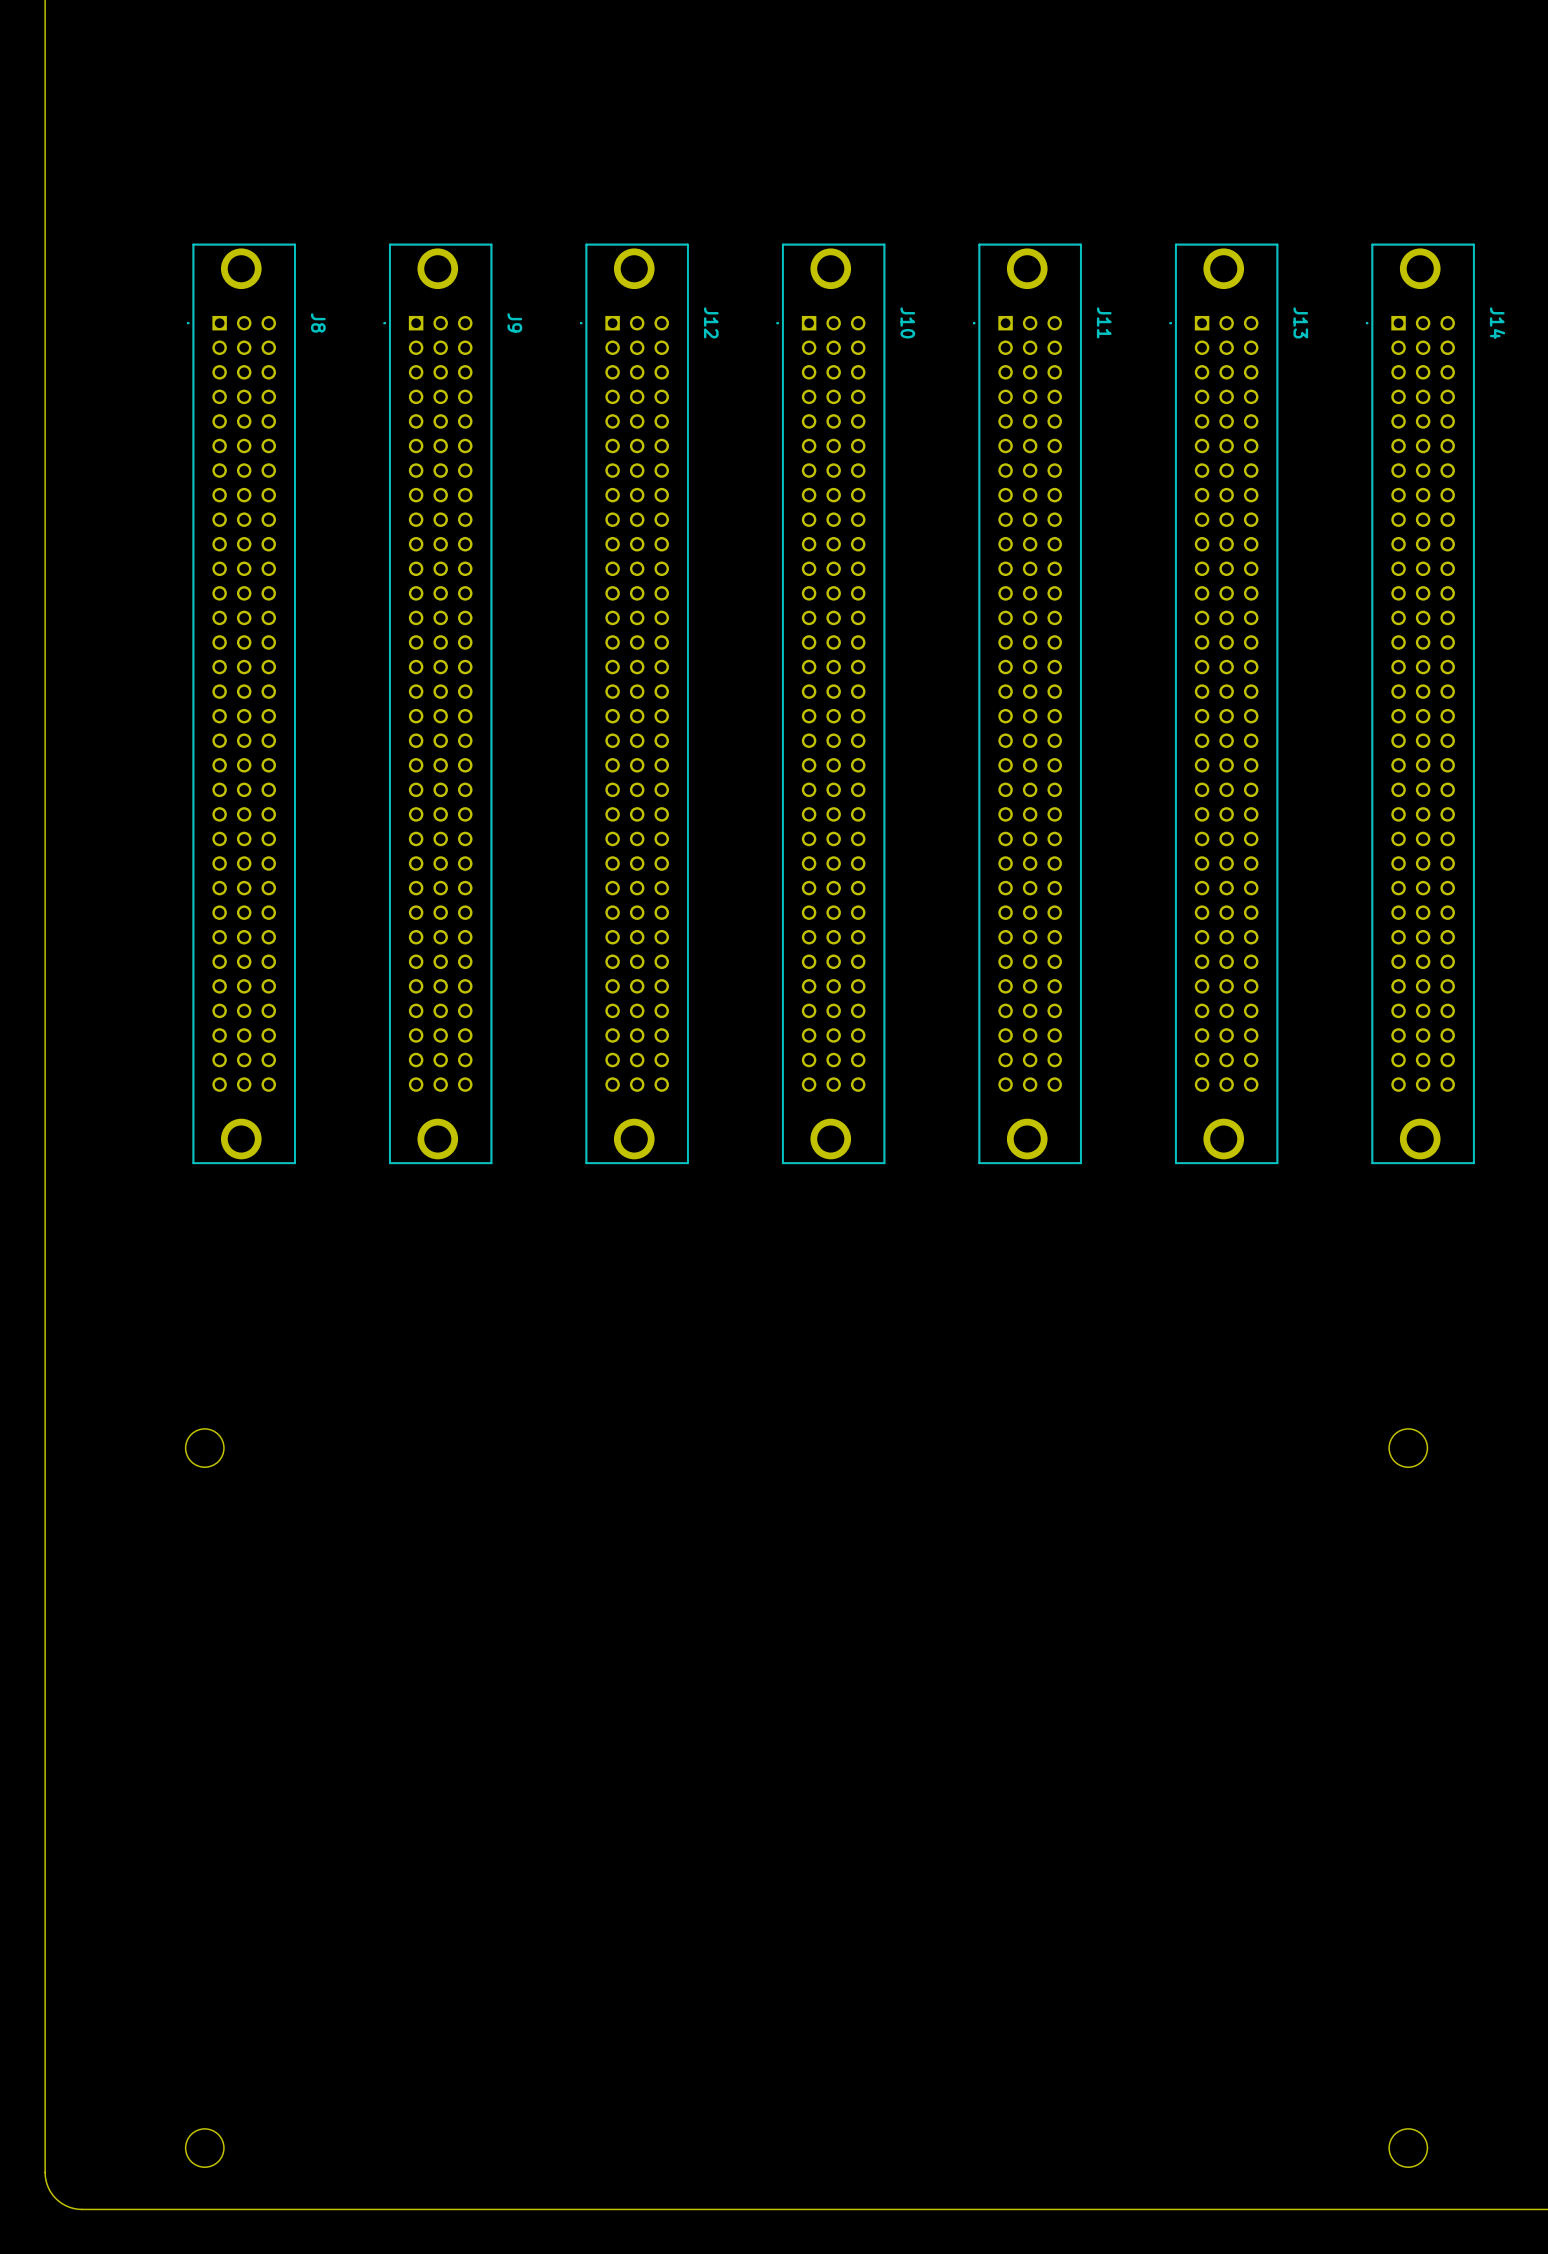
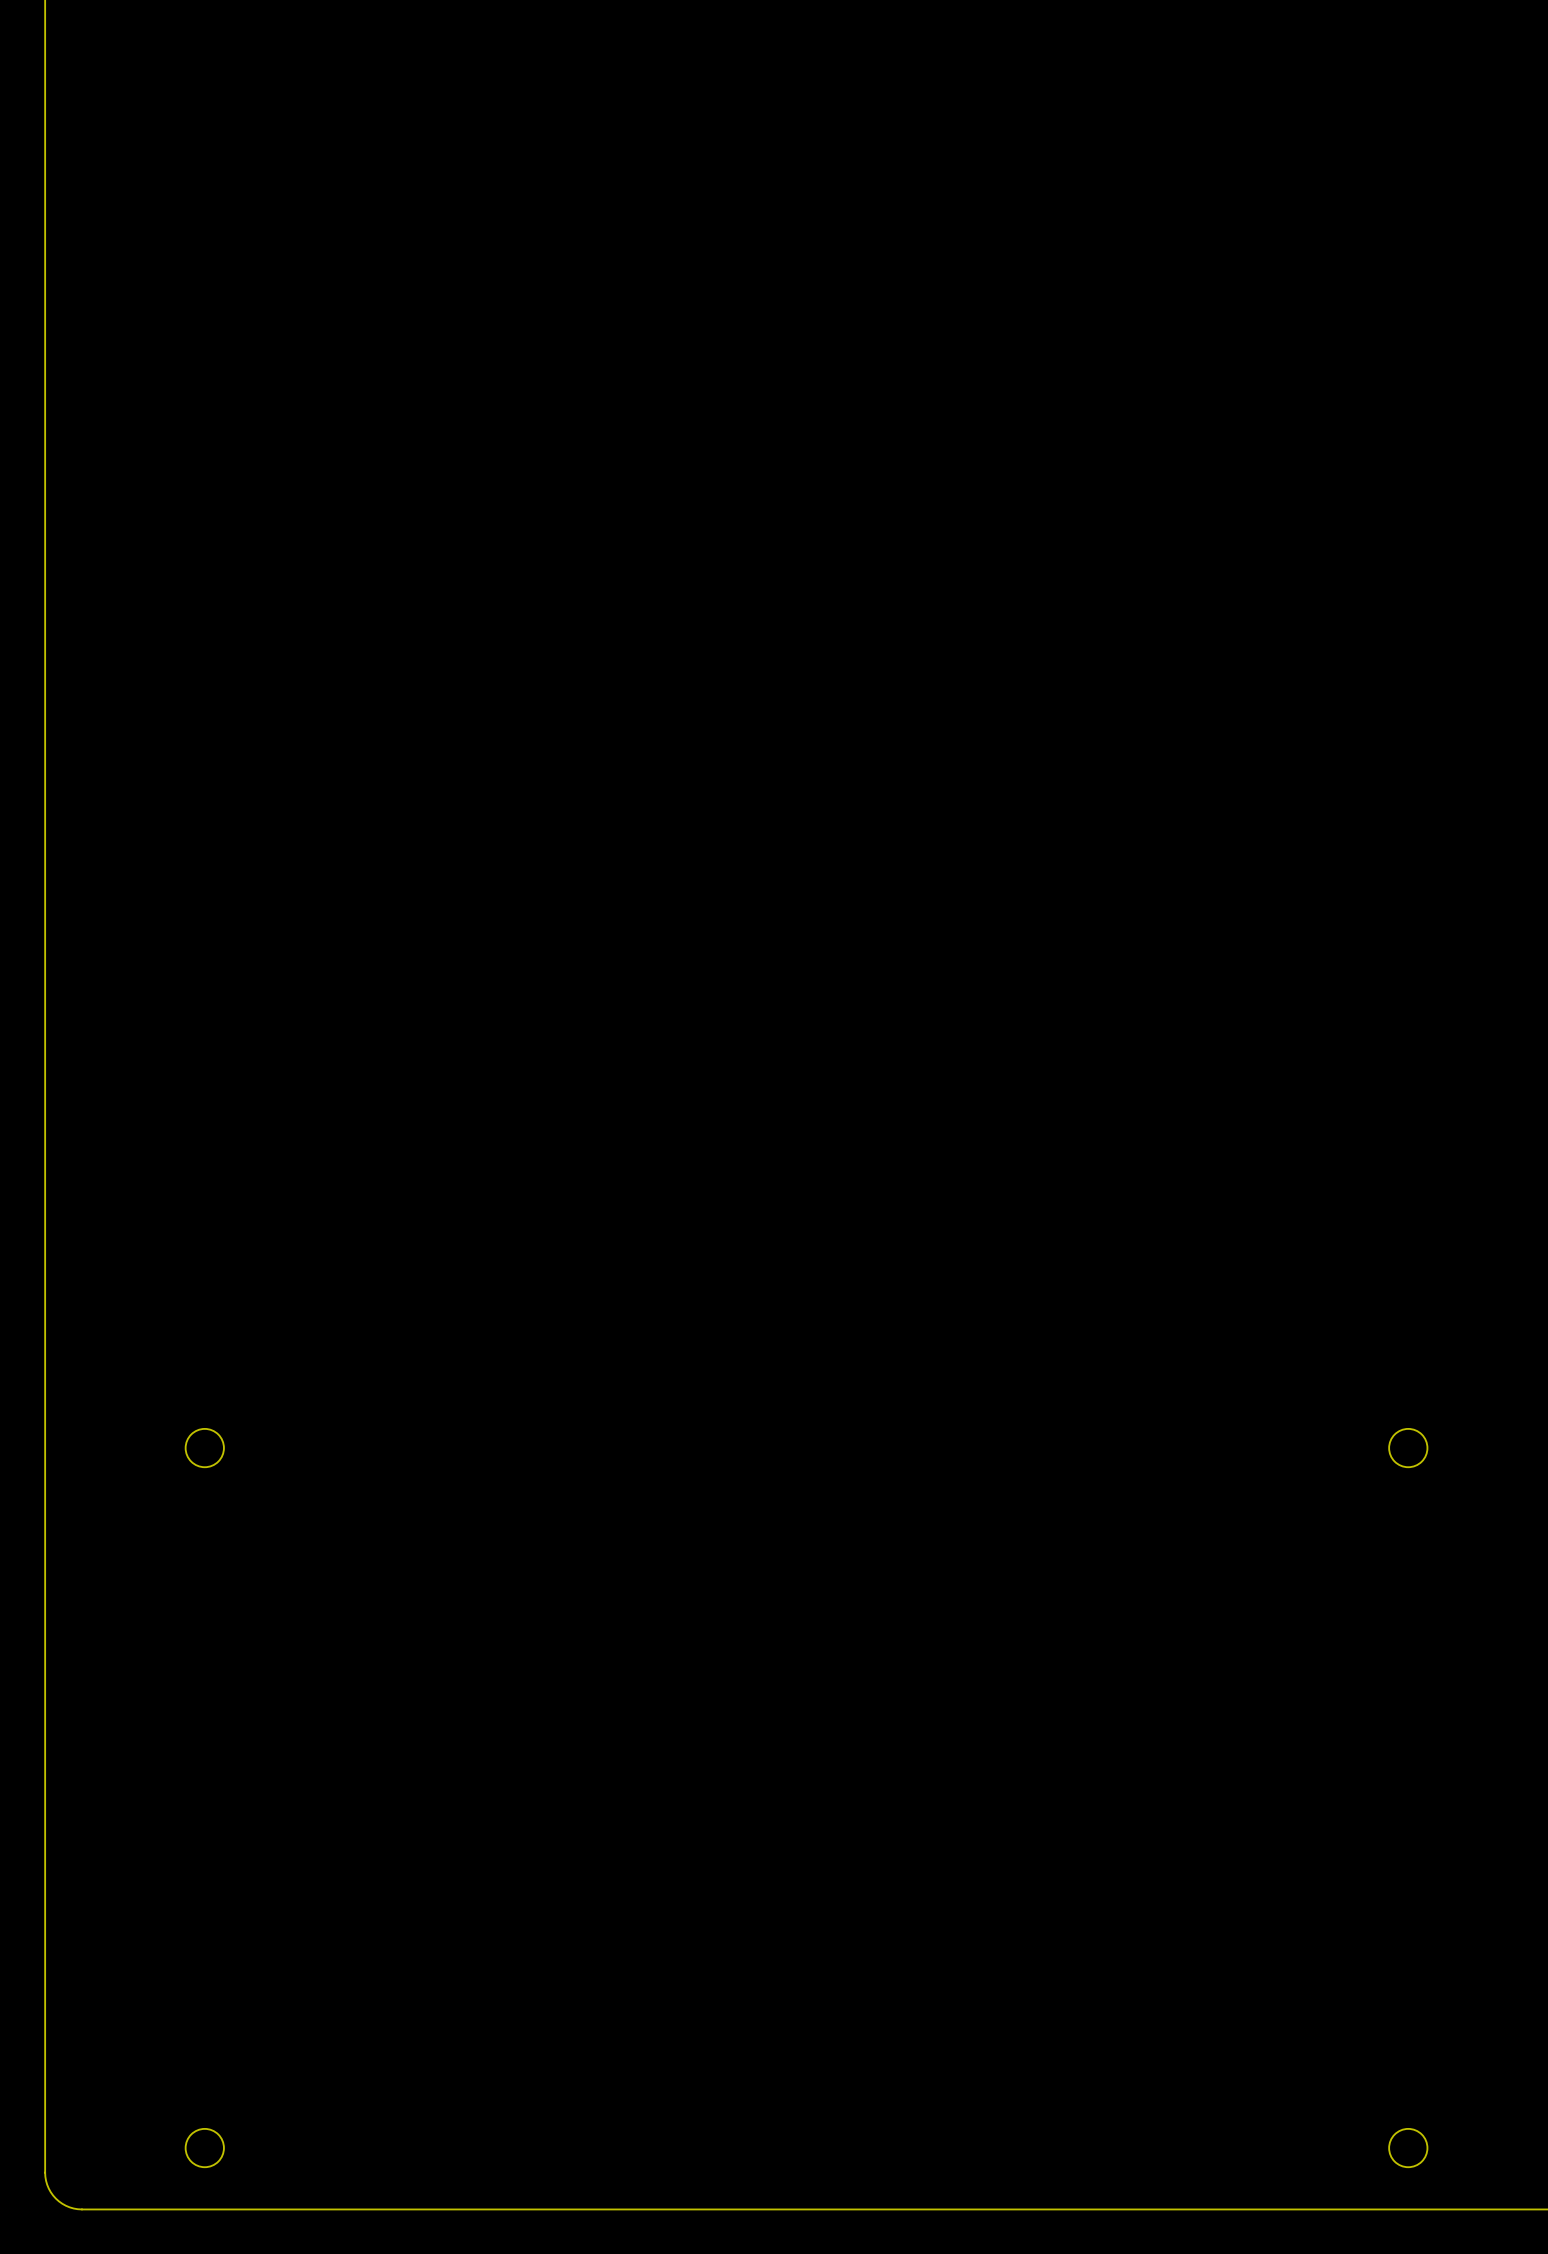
J8: (241, 703) -> none
J9: (438, 703) -> none
J12: (634, 703) -> none
J10: (831, 703) -> none
J11: (1027, 703) -> none
J13: (1224, 703) -> none
J14: (1420, 703) -> none

